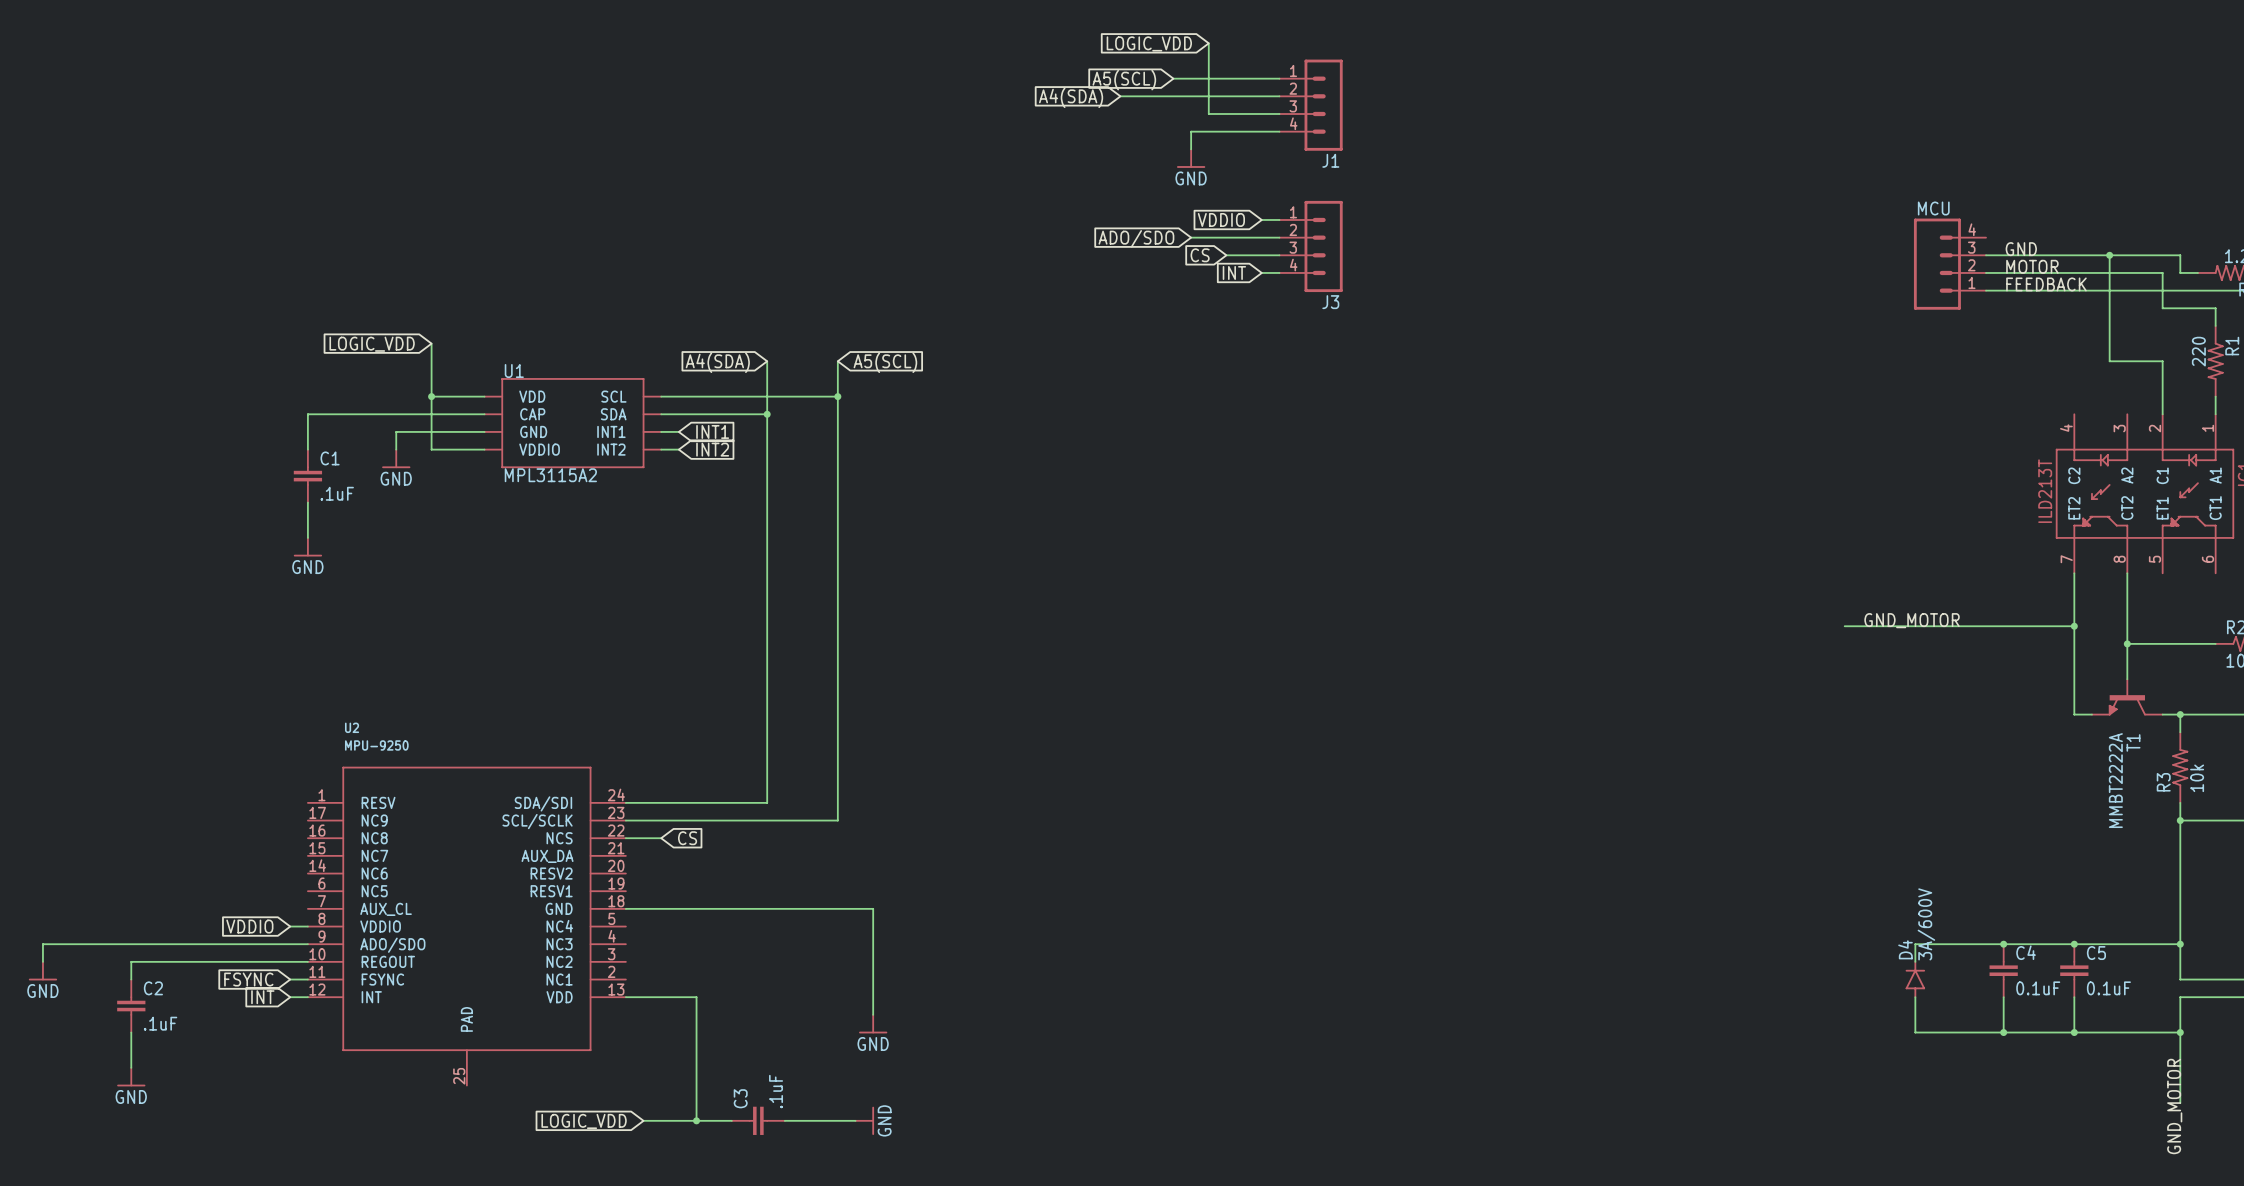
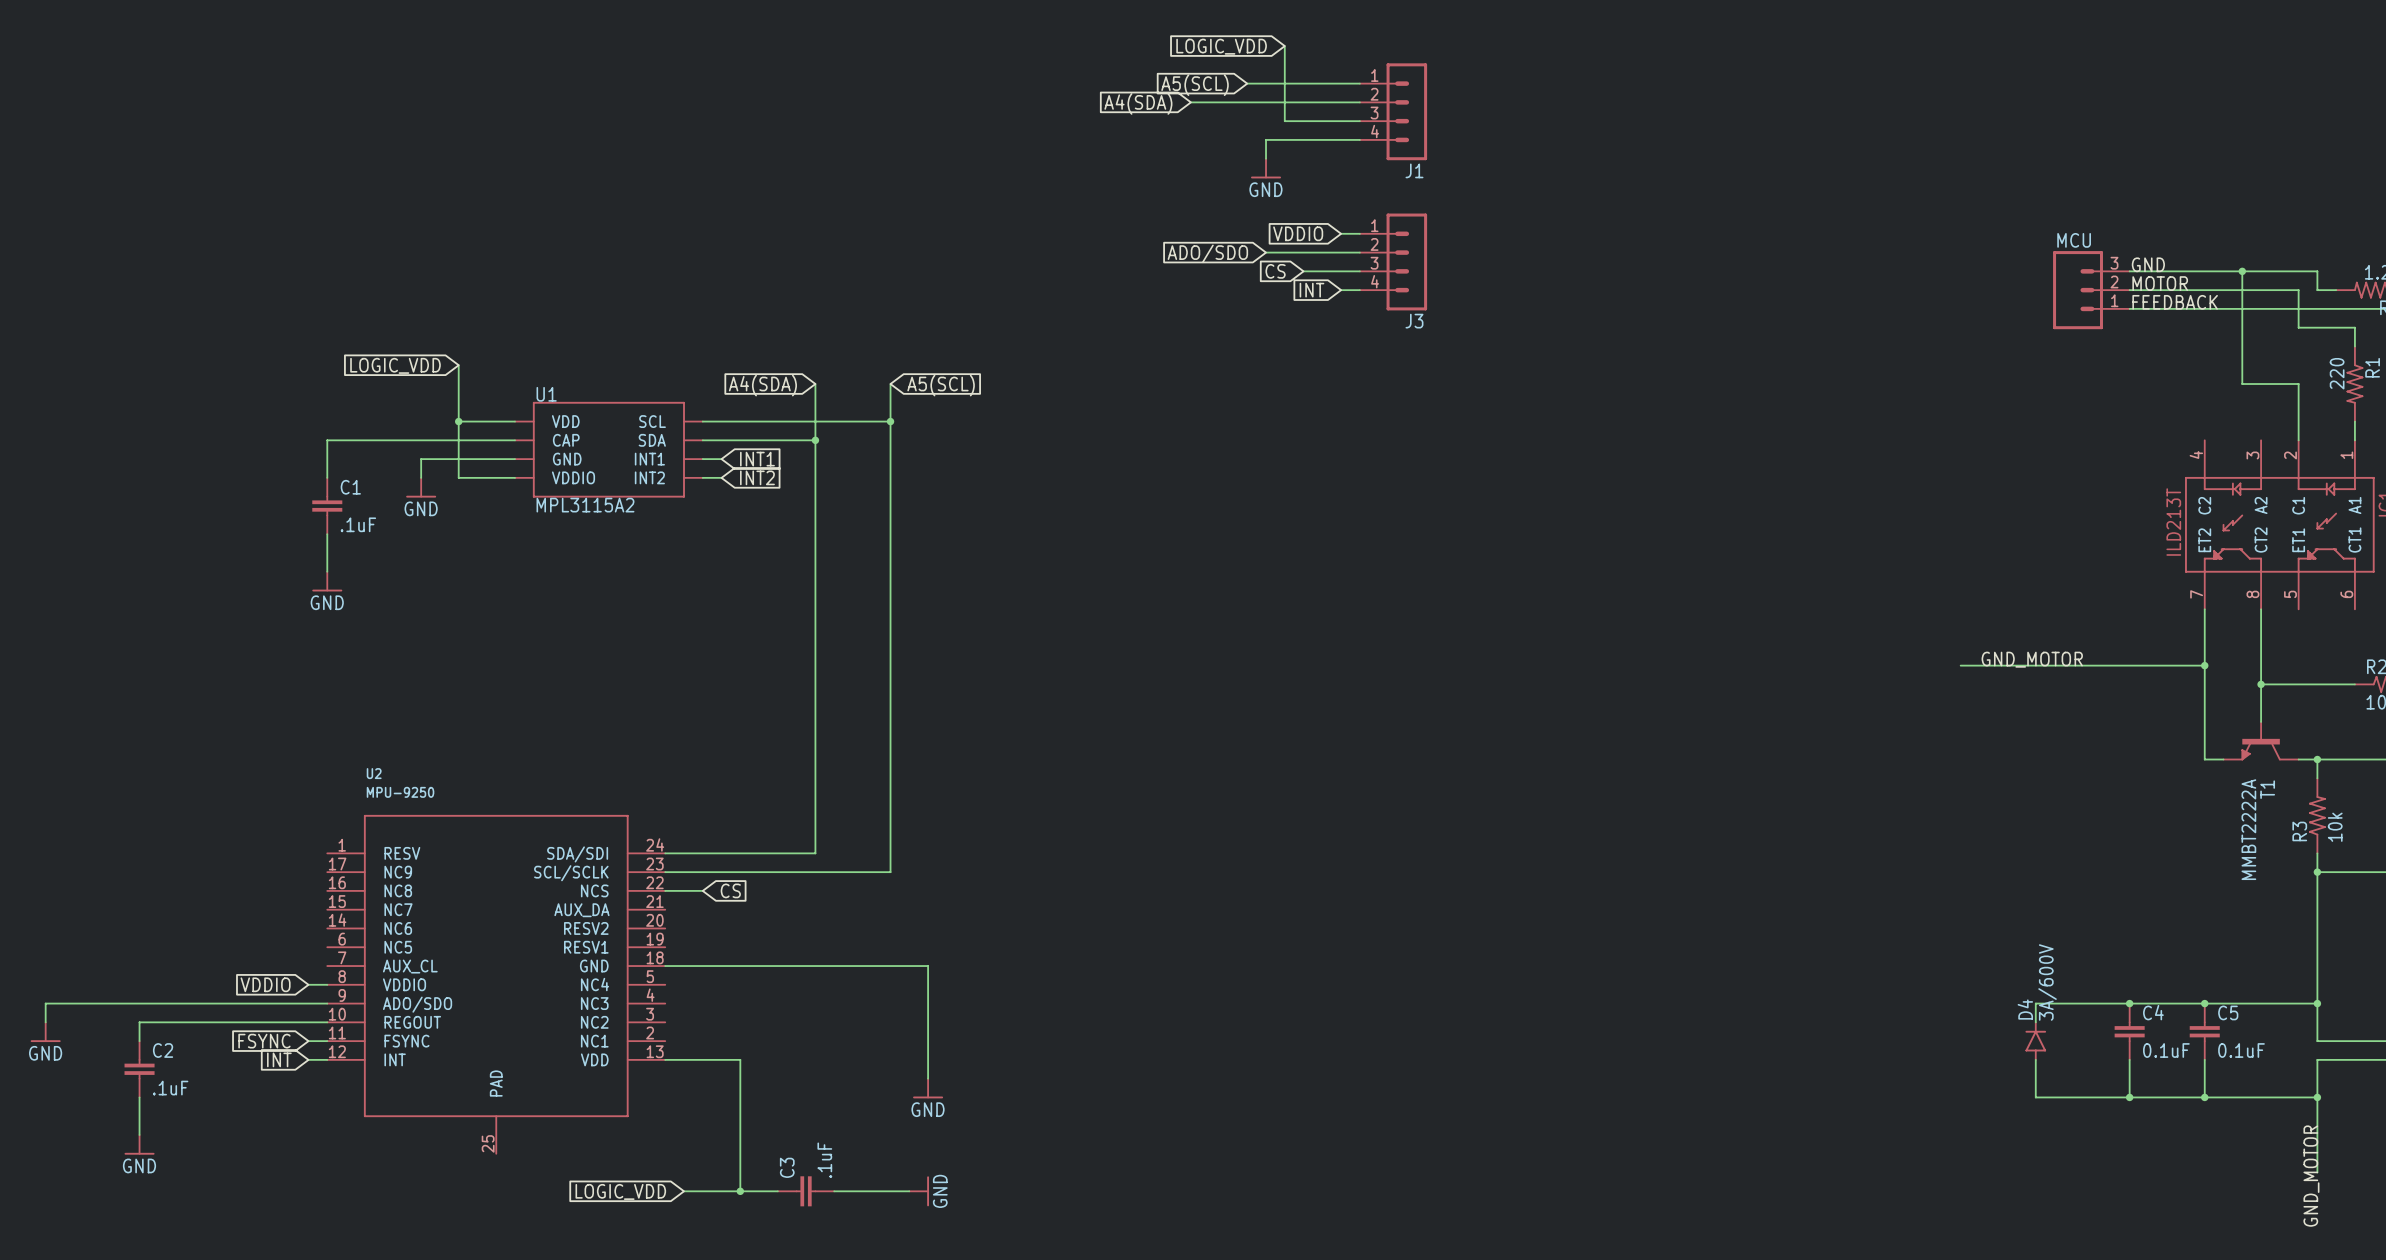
MCU: (1949, 264) -> none
MCU: none -> (2091, 290)

